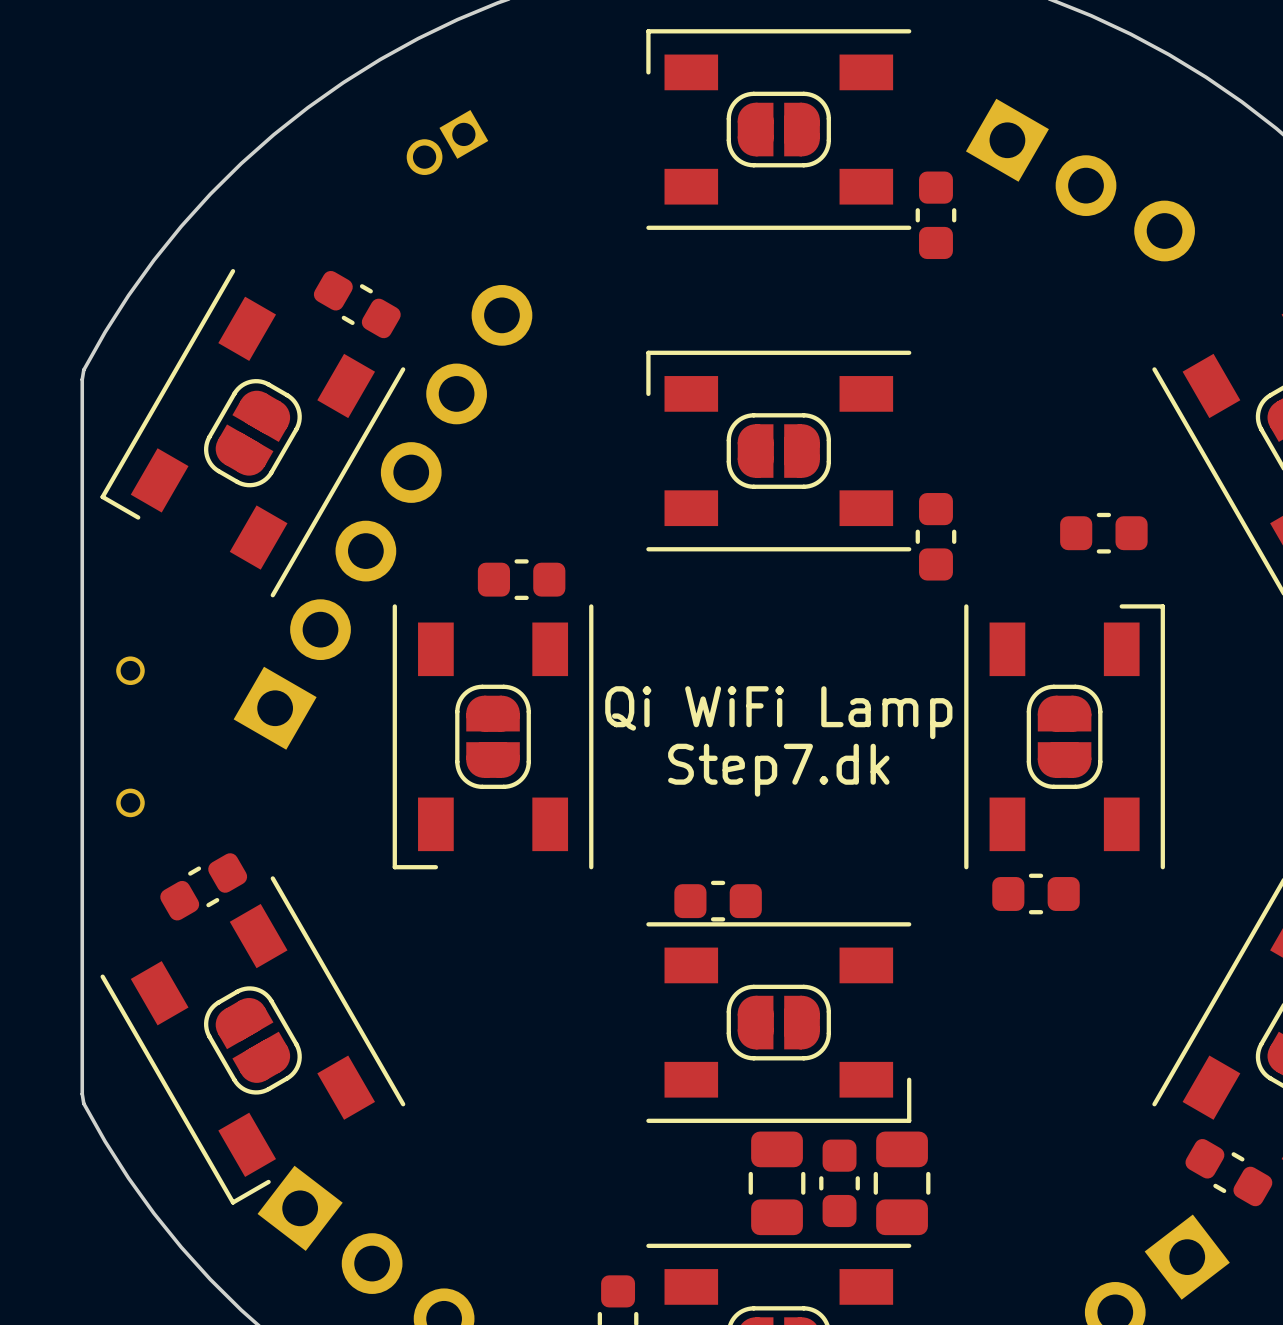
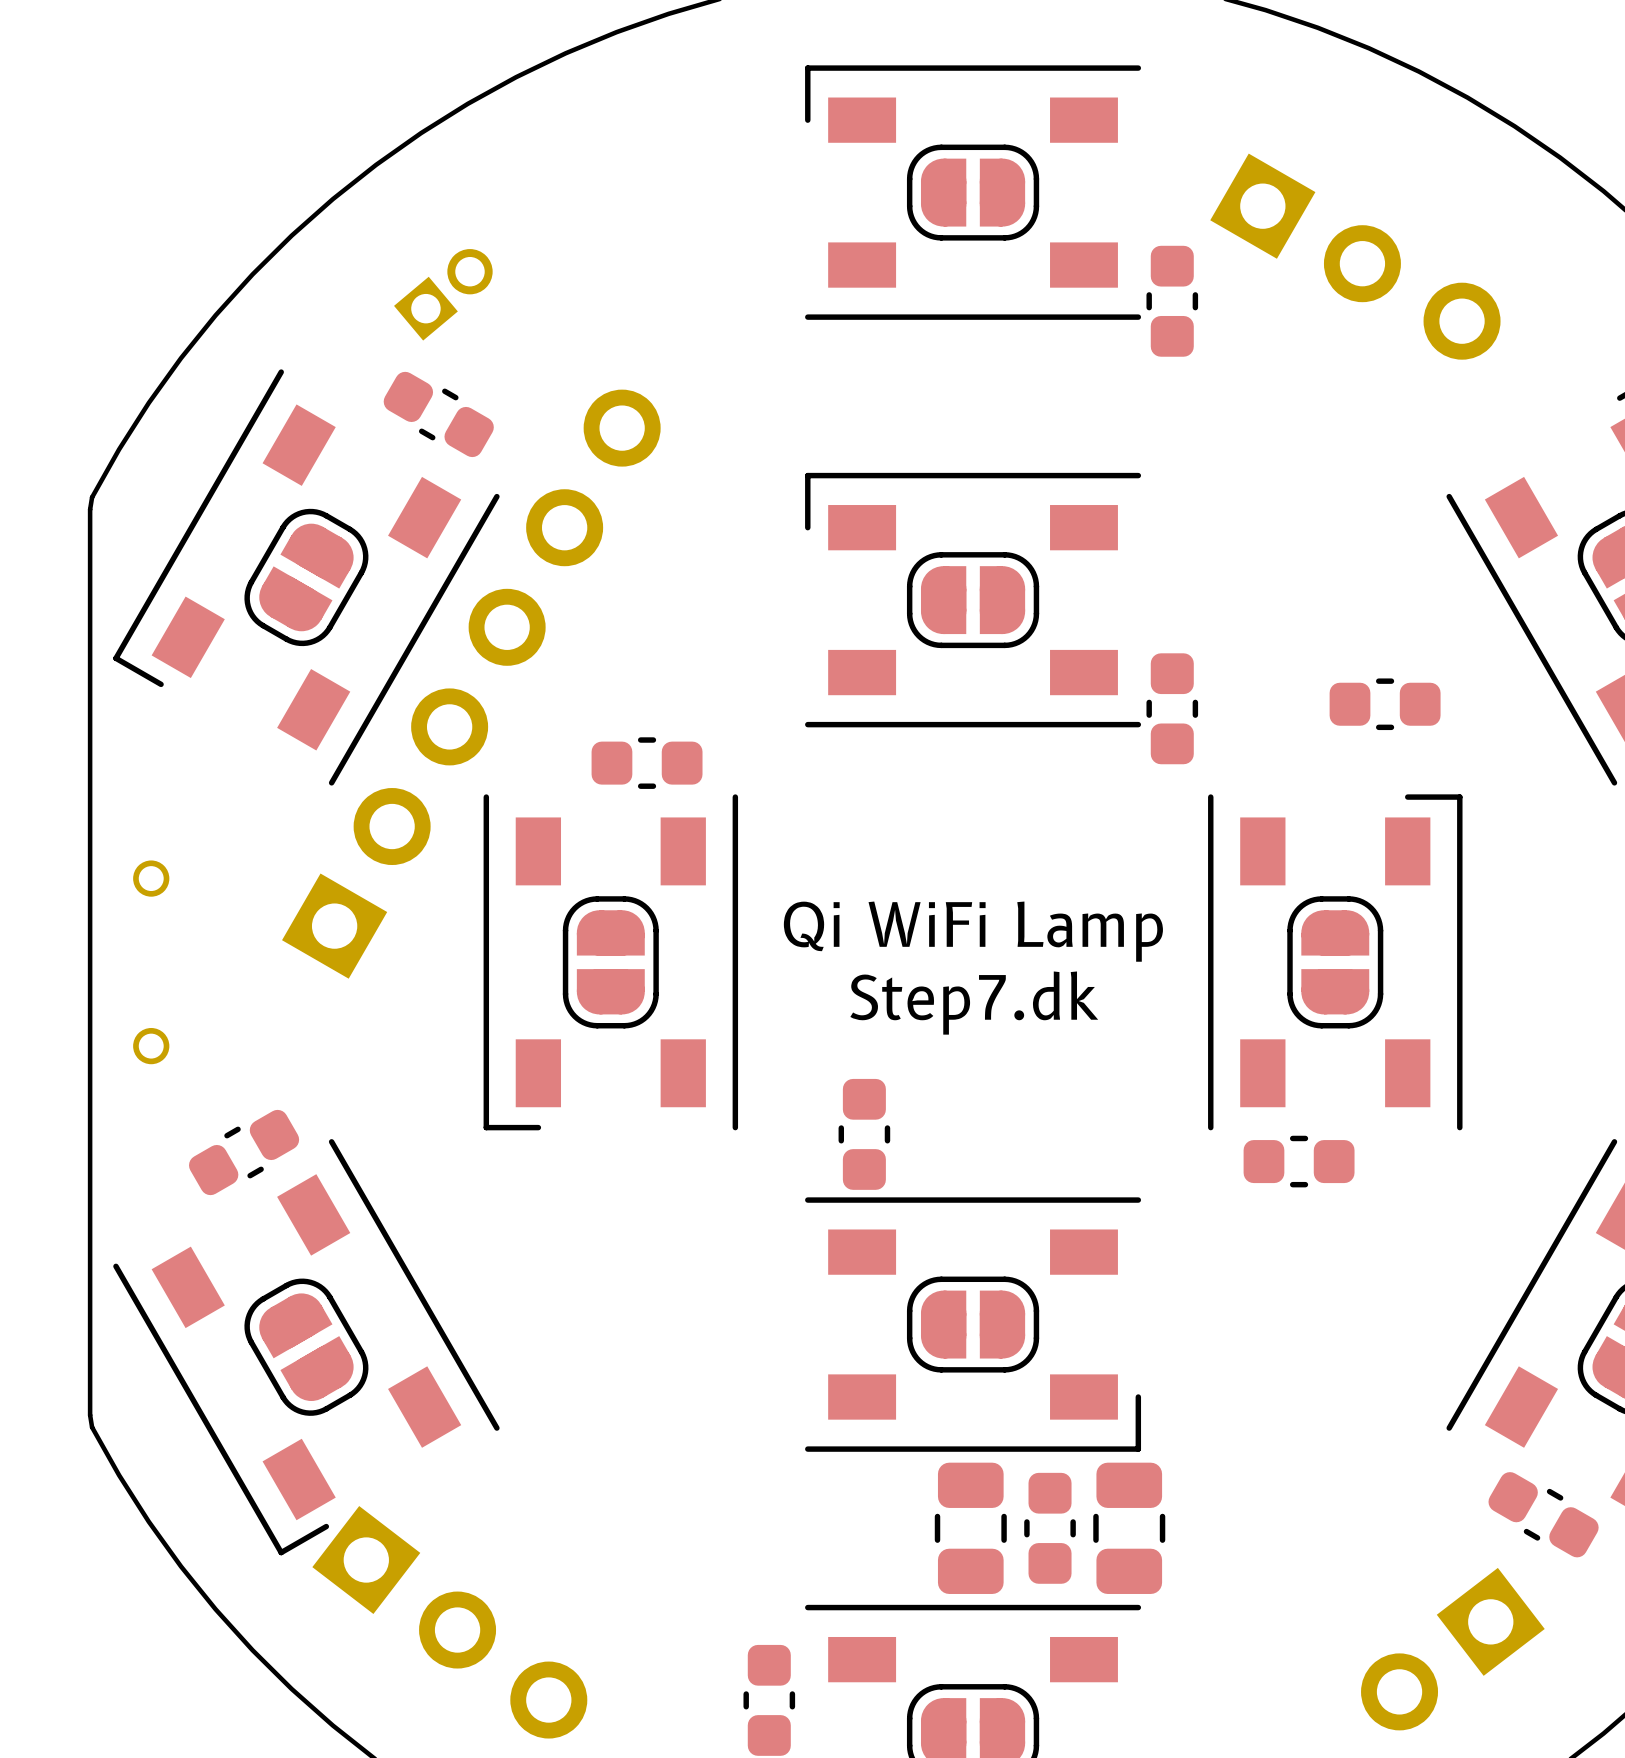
part: (447, 142) -> none
part: none -> (443, 294)
part rotation: 0° (718, 901) -> 90° clockwise (864, 1134)

